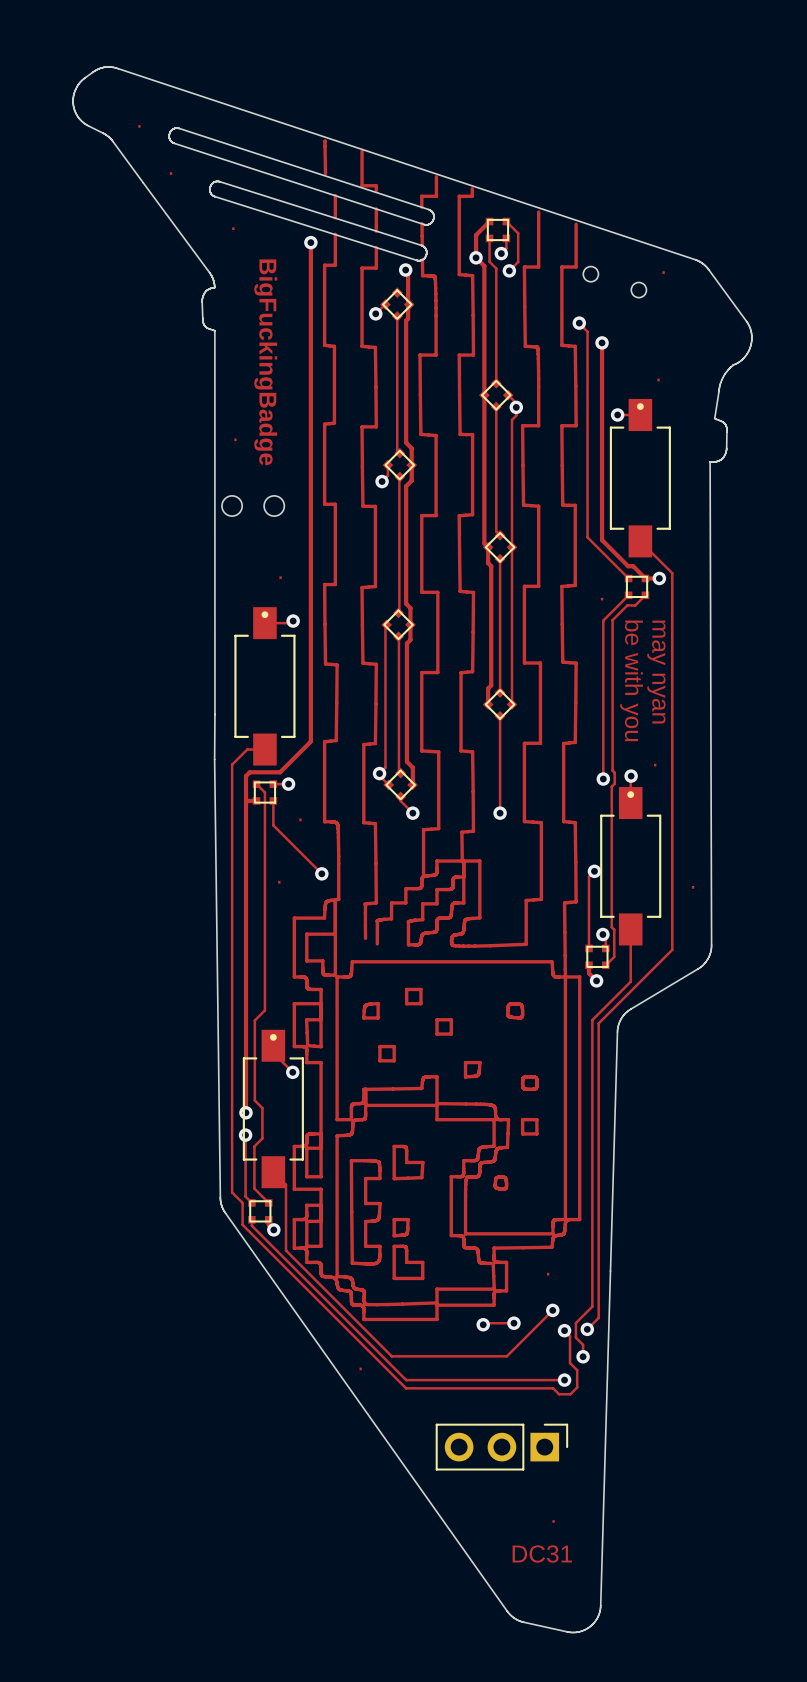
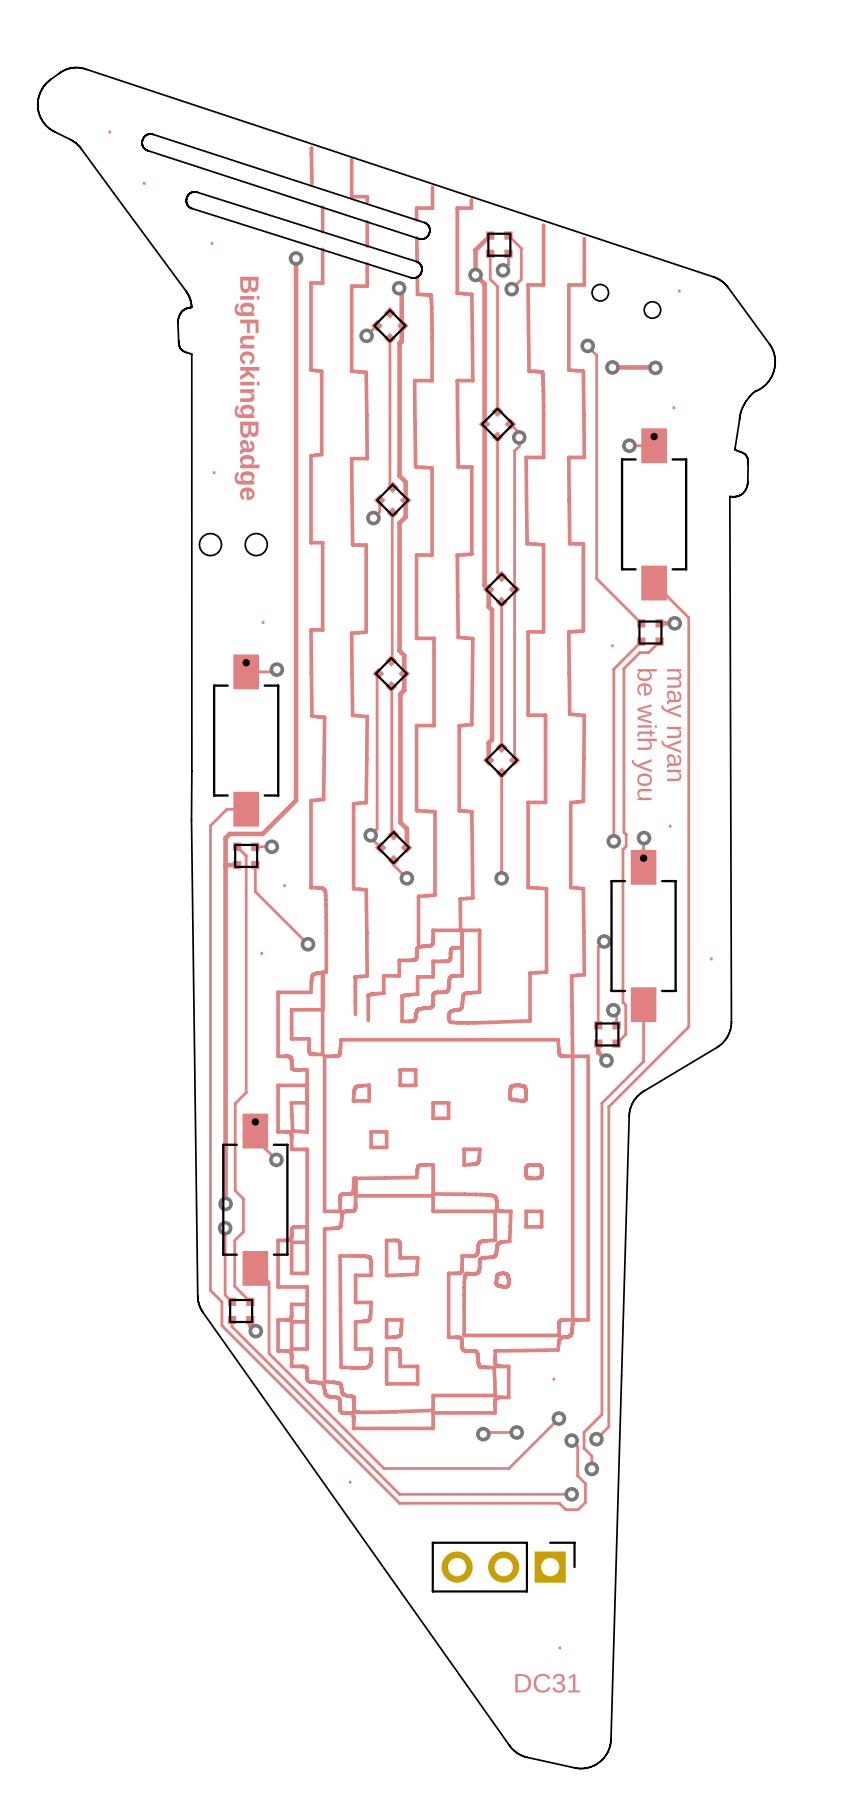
track: (602, 342) (602, 540) (628, 566) (633, 566) (645, 578) -> (612, 367) (655, 367)
via: none -> (655, 367)

